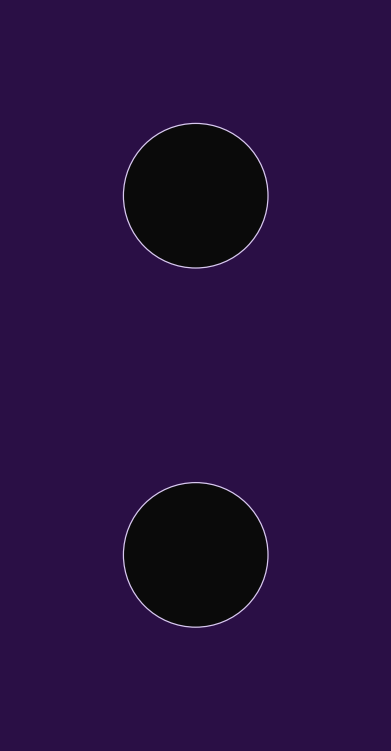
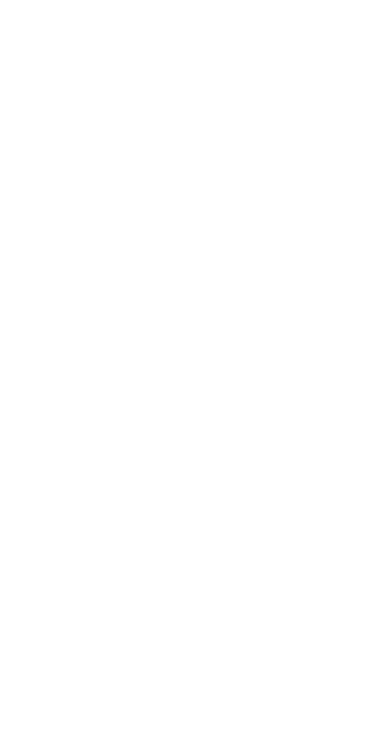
part: (195, 195) -> none
part: (195, 554) -> none

